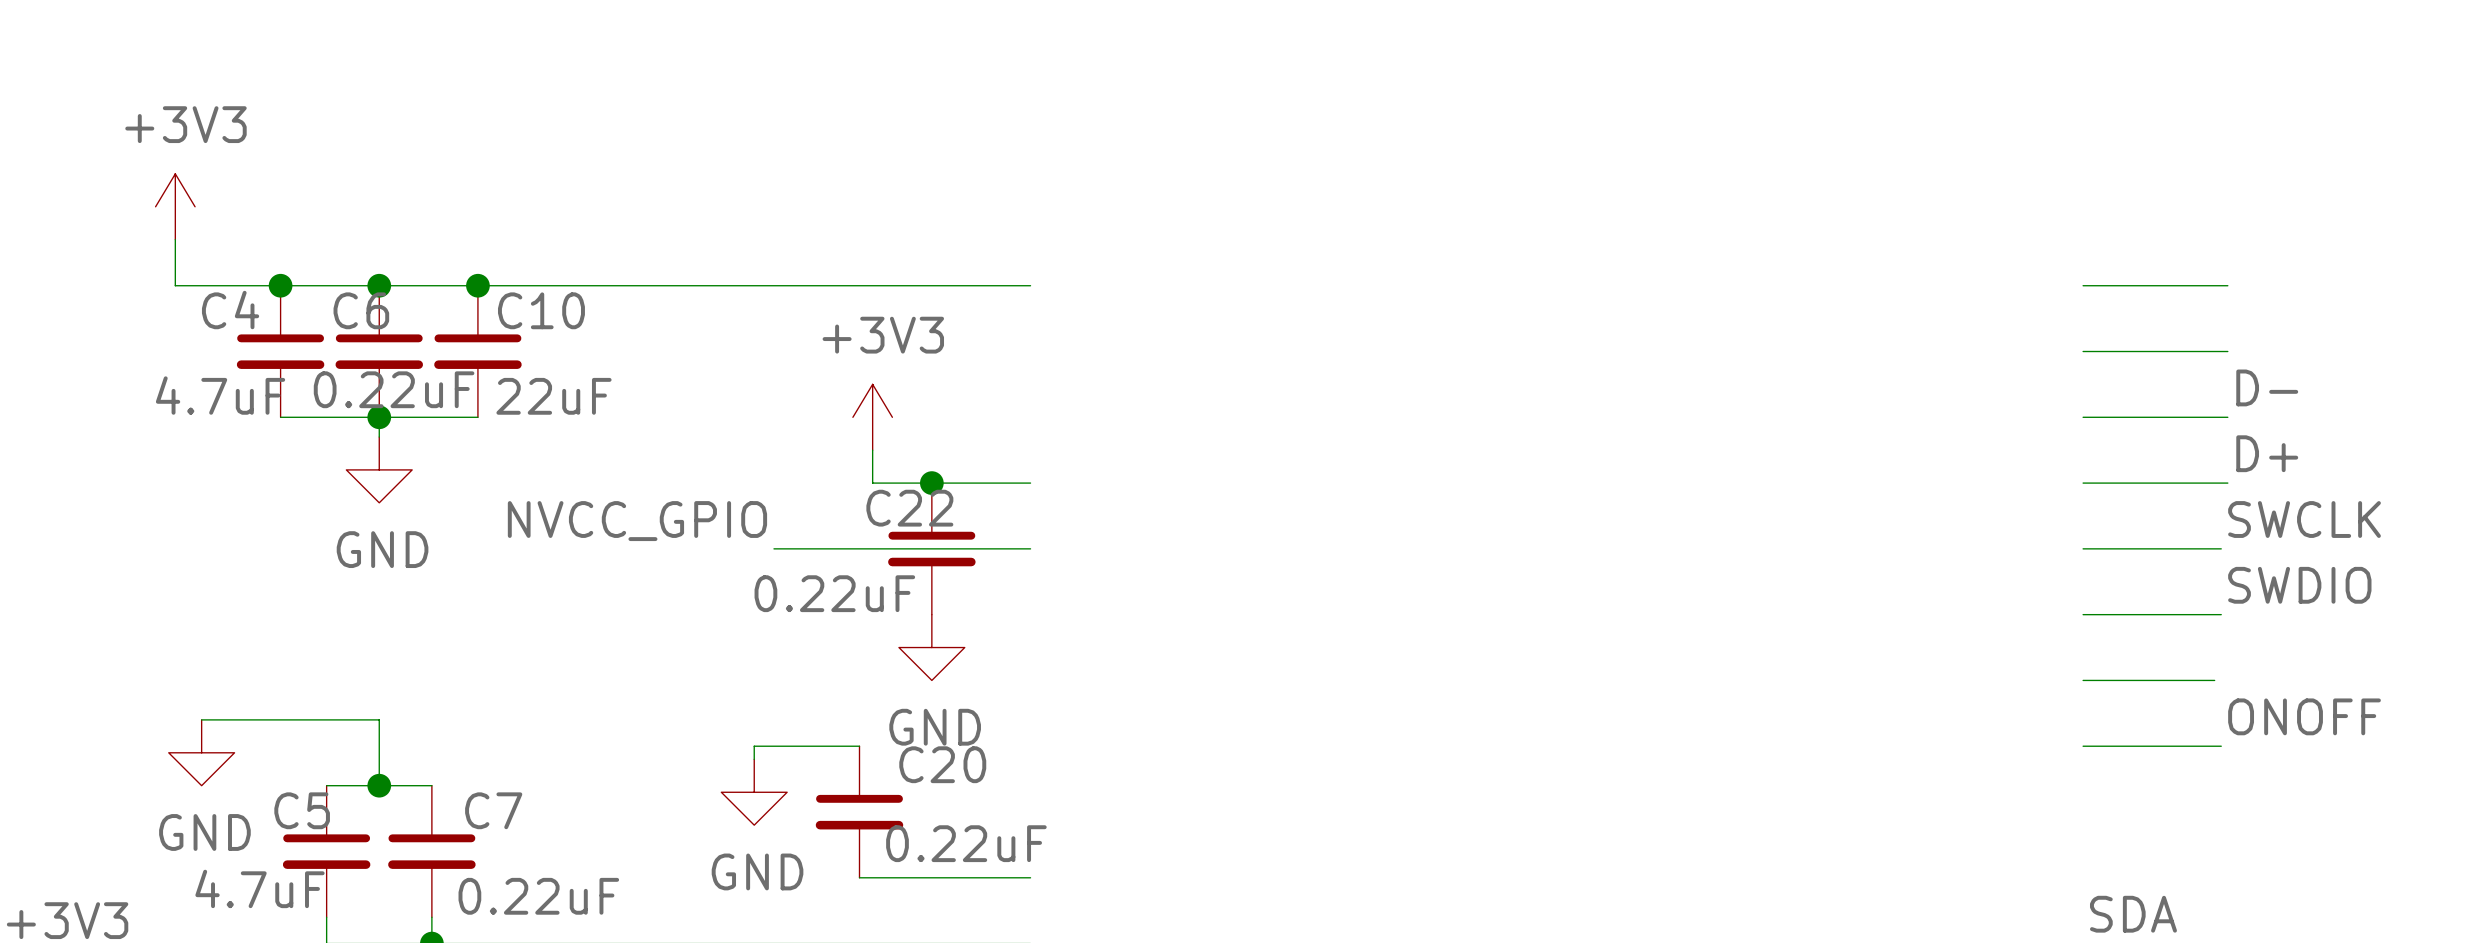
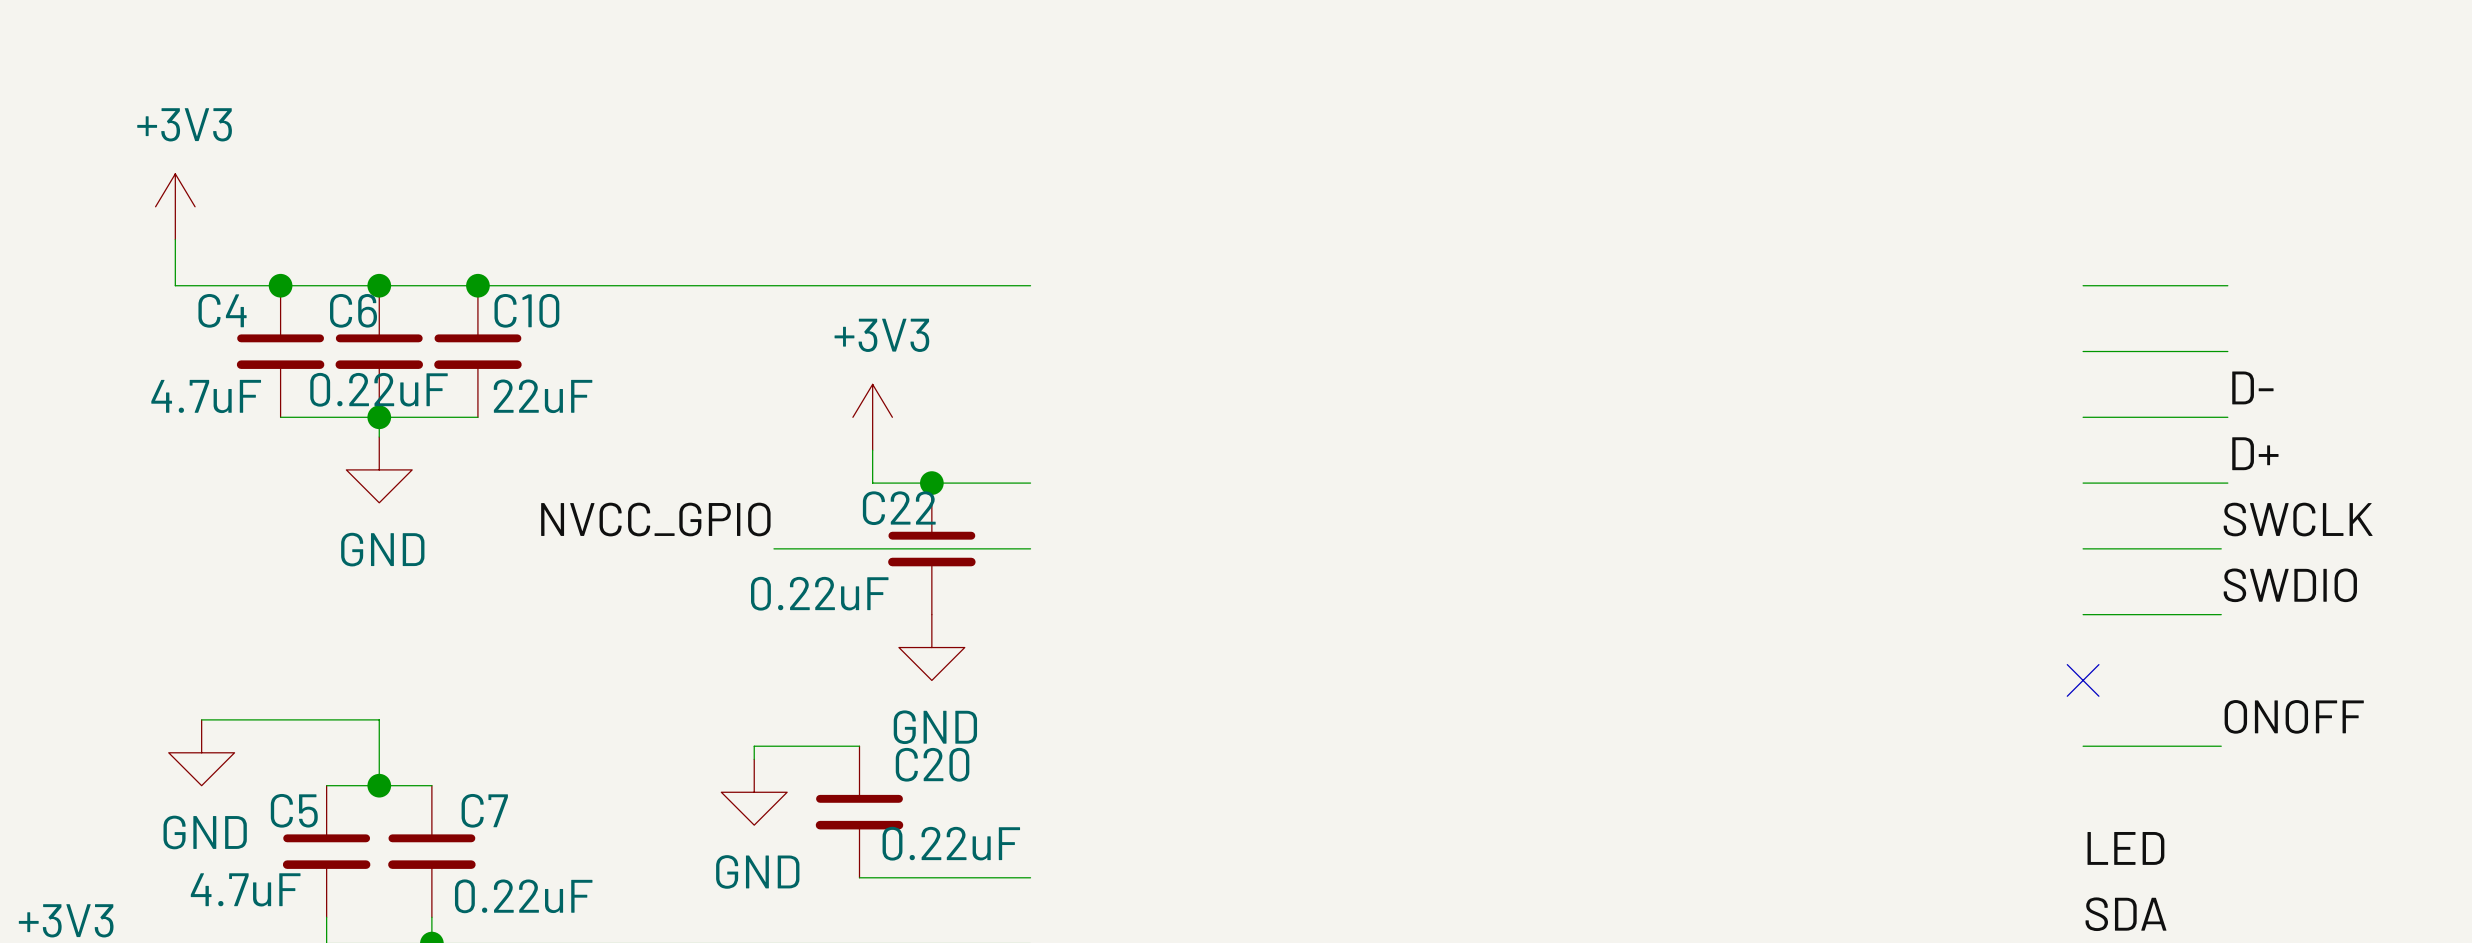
wire: (2083, 680) (2214, 680) -> none
no-connect mark: none -> (2083, 680)
label: none -> LED (2125, 848)

